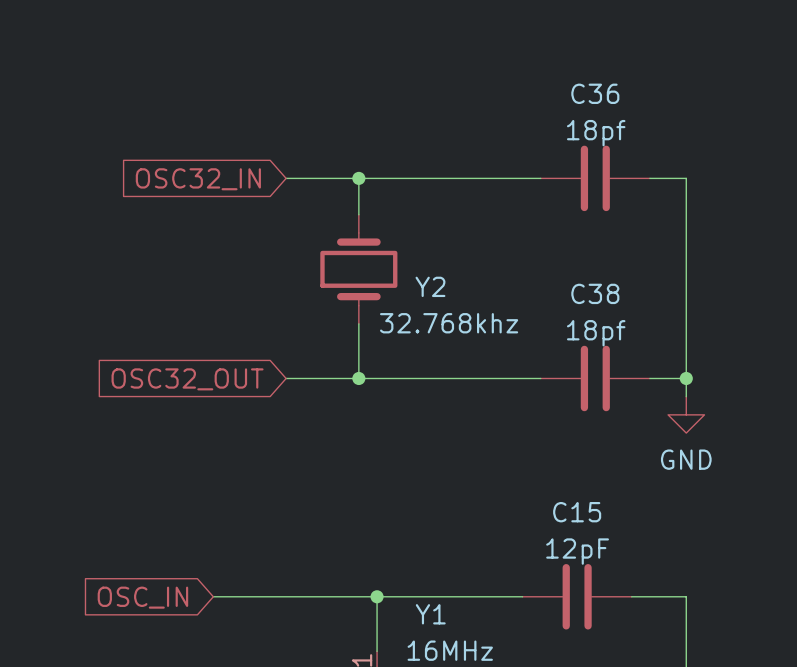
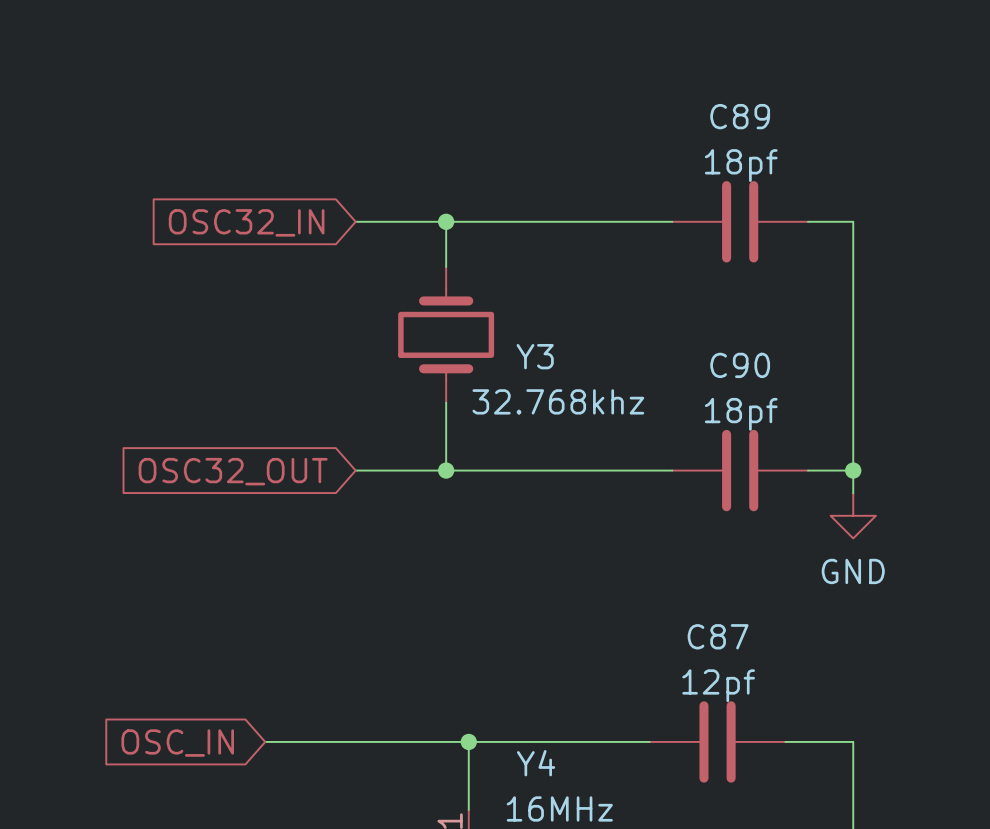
C36 name: C36 (595, 93) -> C89 (740, 116)
Y2 name: Y2 (430, 286) -> Y3 (535, 356)
C38 name: C38 (595, 293) -> C90 (740, 365)
C15 name: C15 (577, 512) -> C87 (718, 636)
C15 value: 12pF (577, 551) -> 12pf (718, 685)
Y1 name: Y1 (430, 614) -> Y4 (536, 763)

